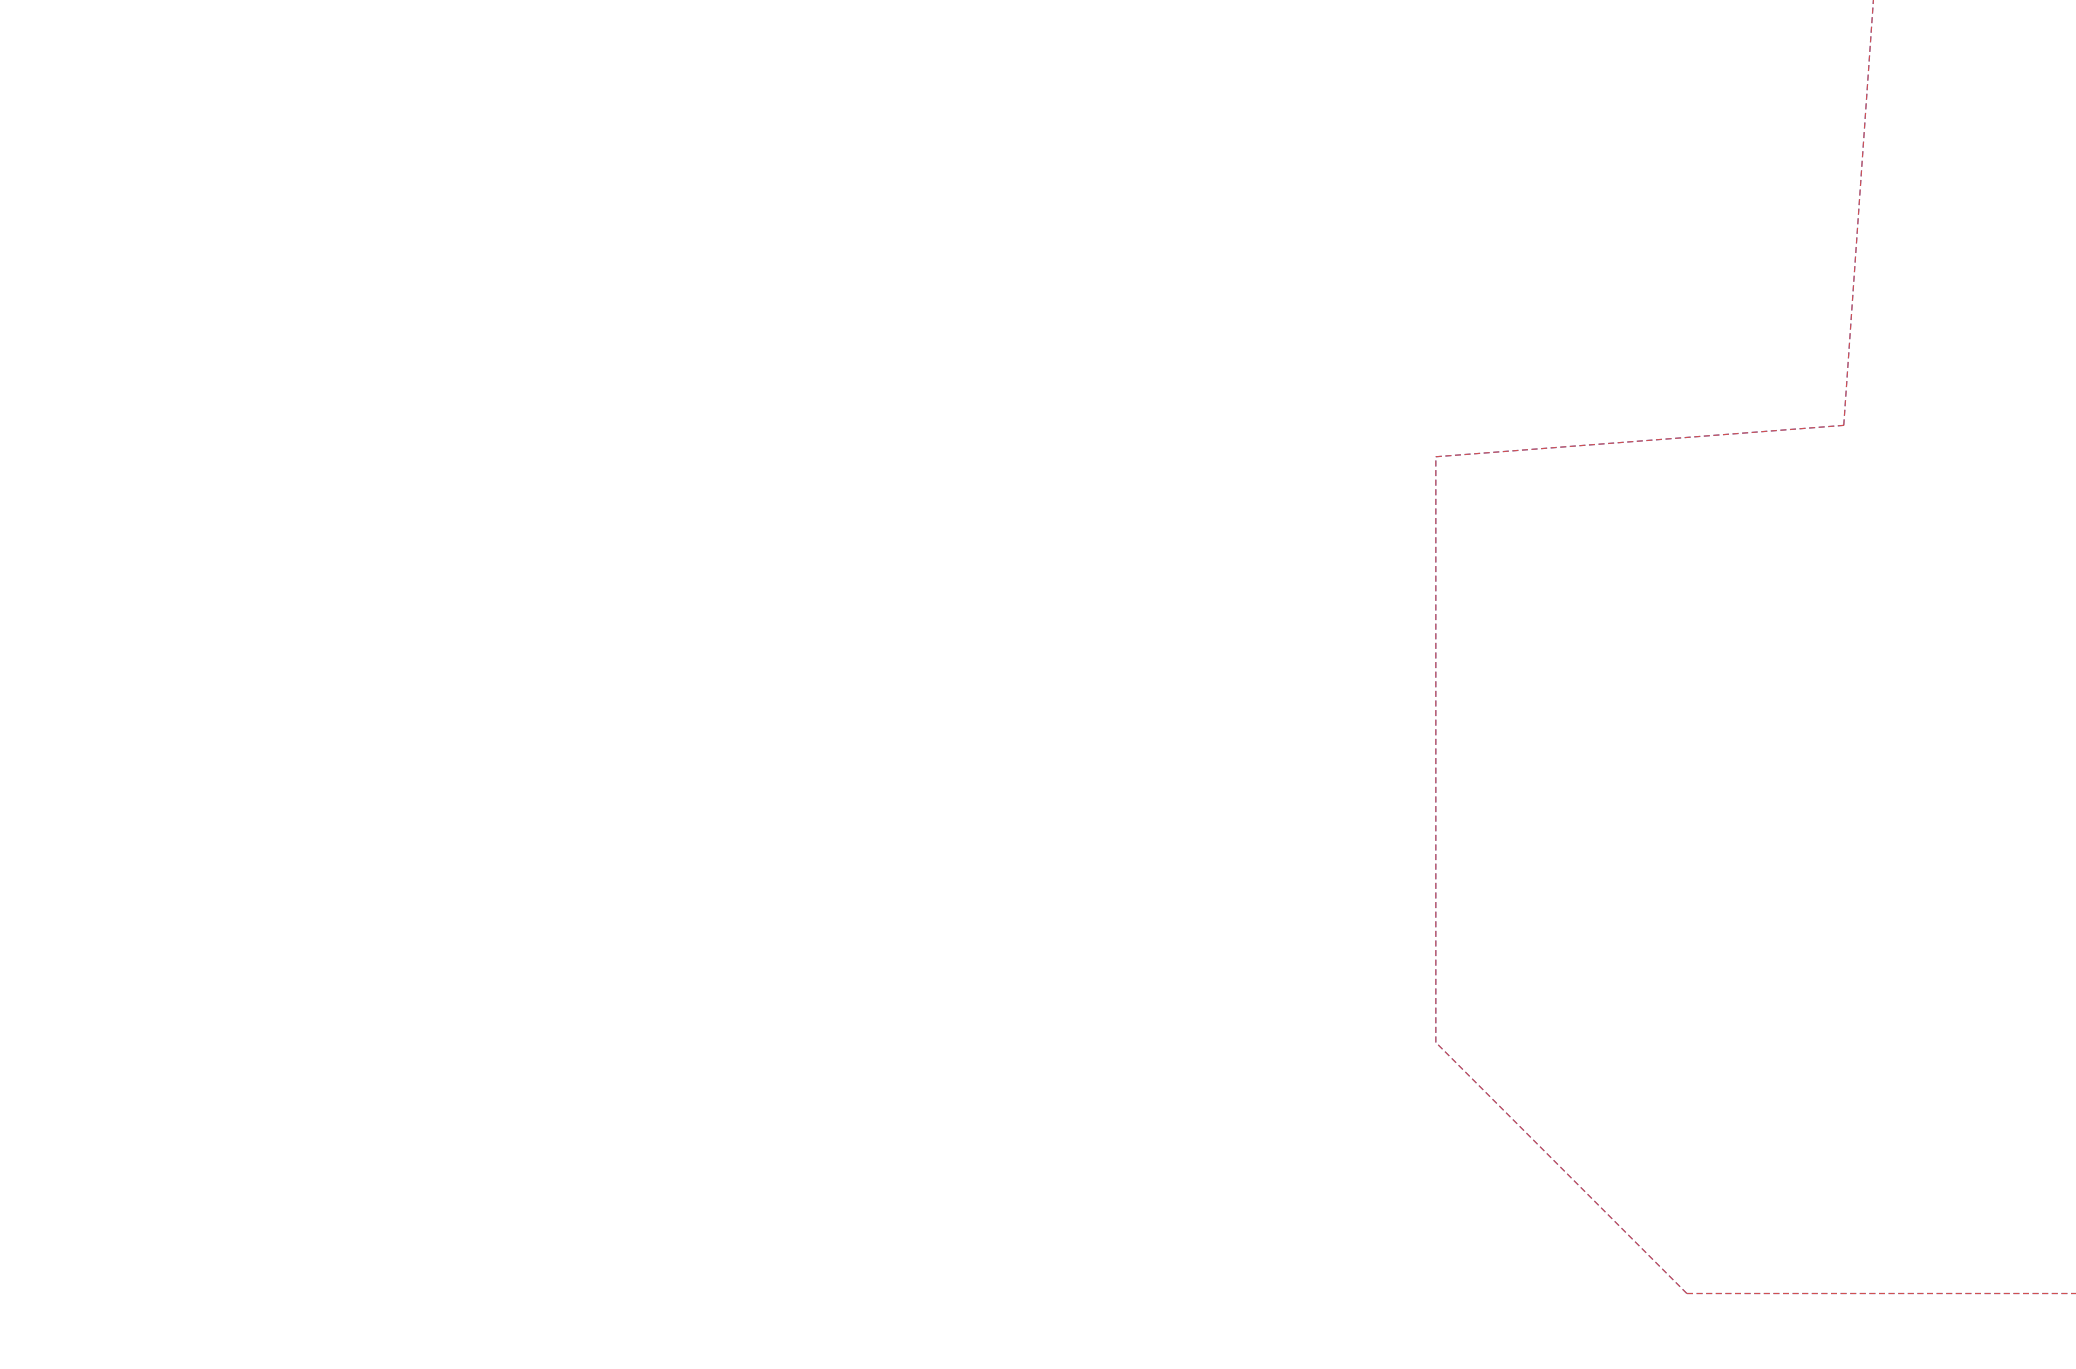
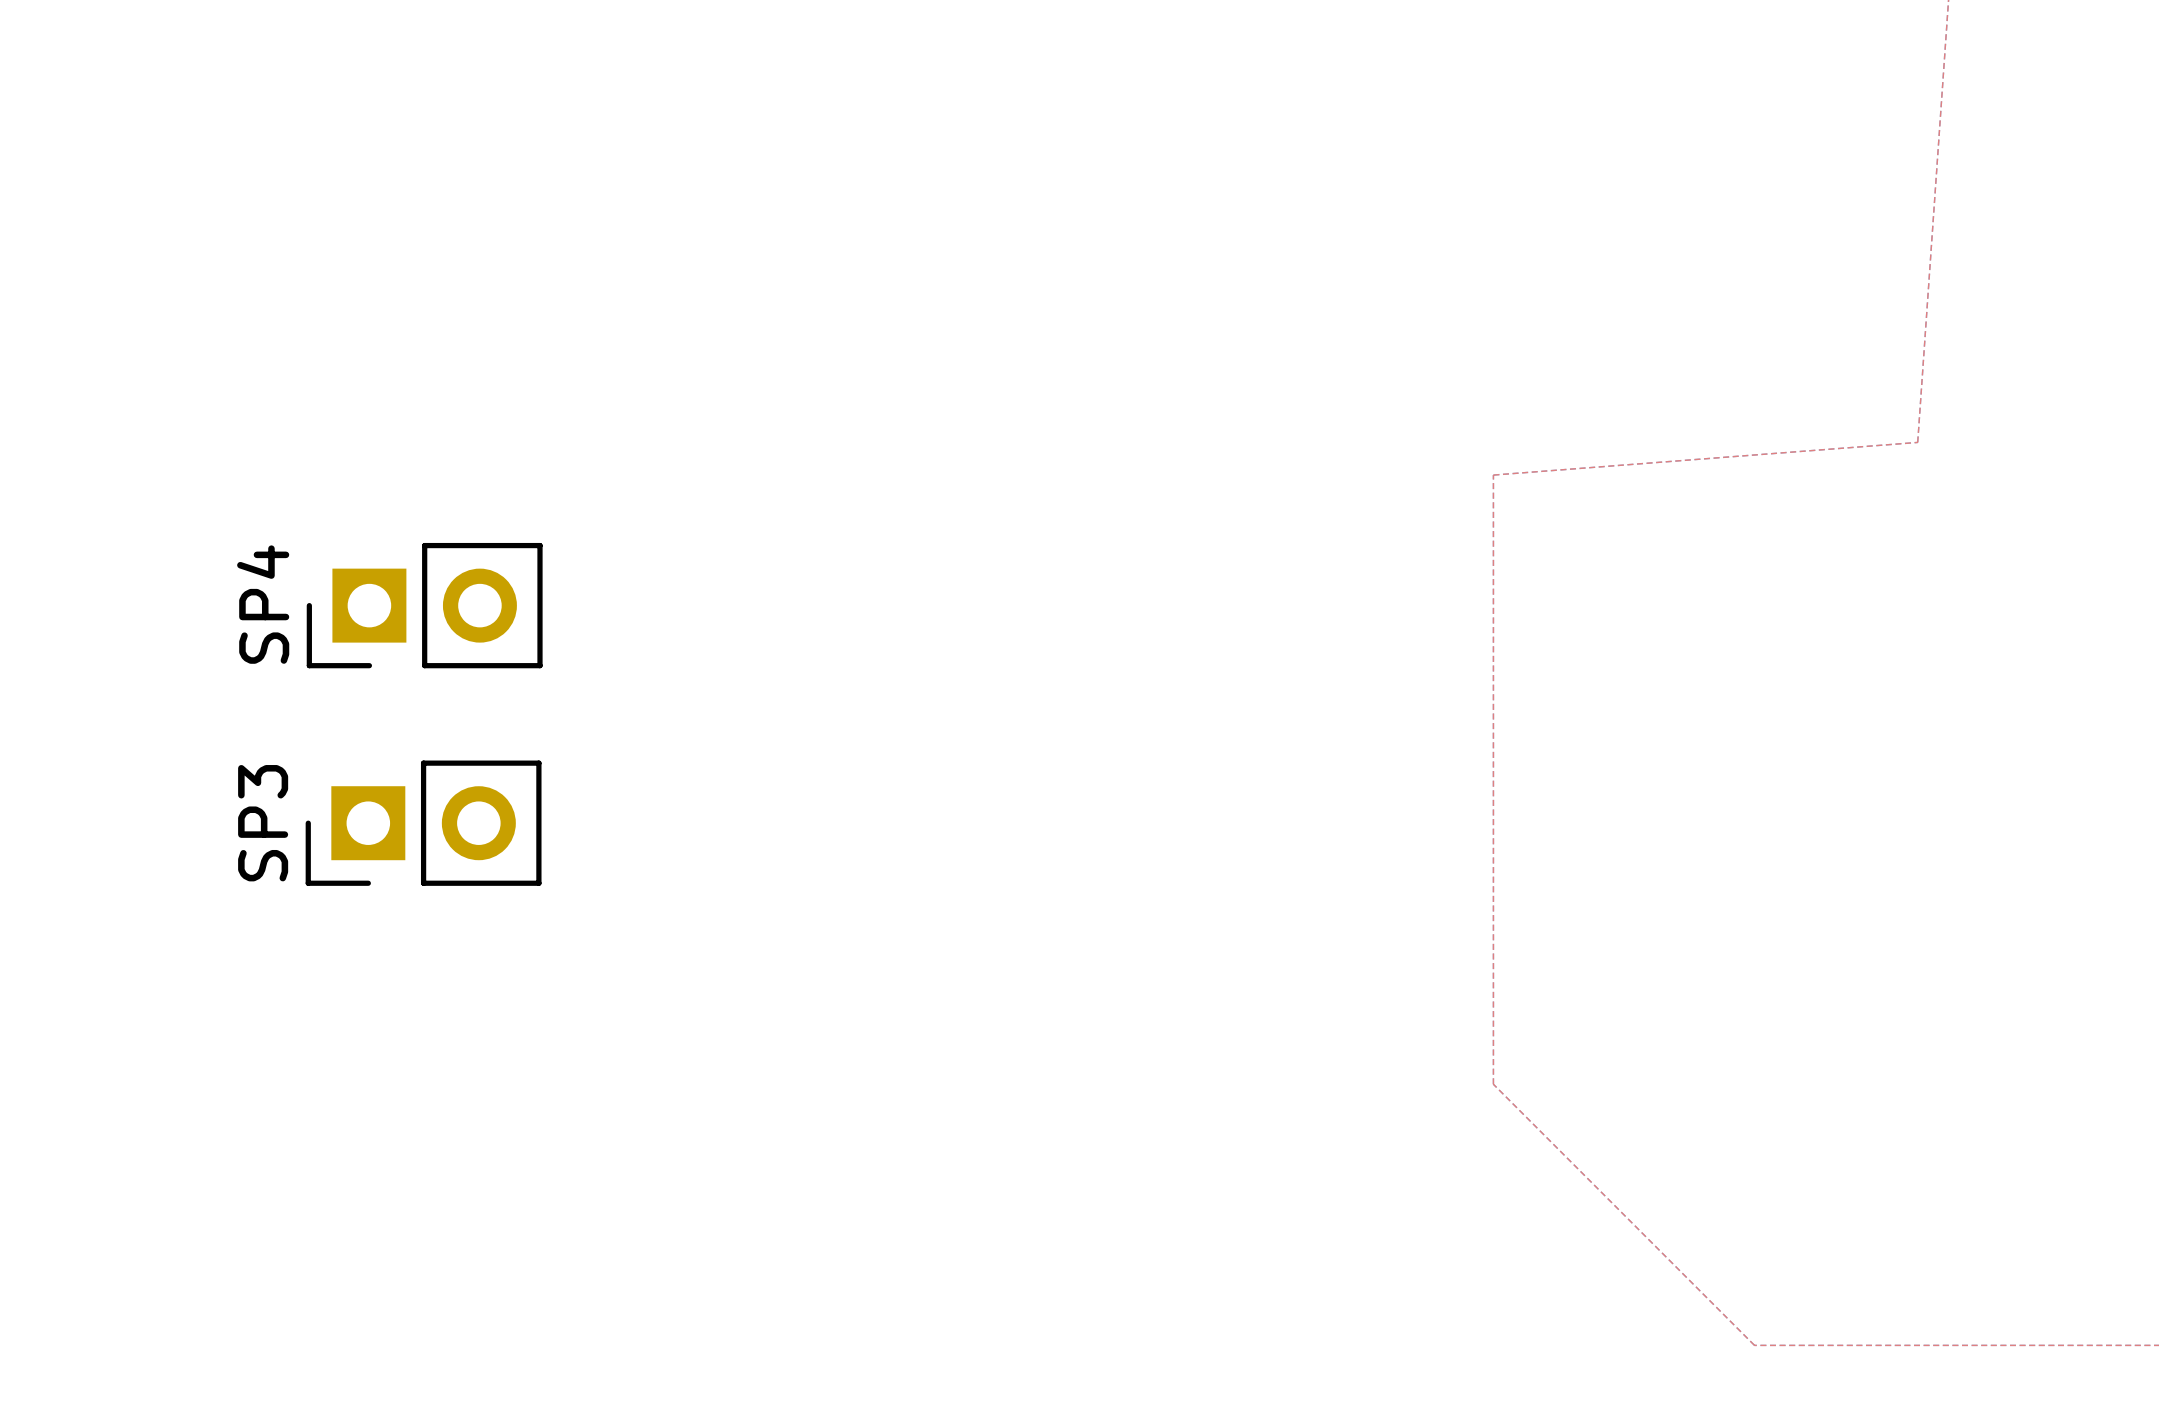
SP4: none -> (424, 605)
SP3: none -> (423, 823)

